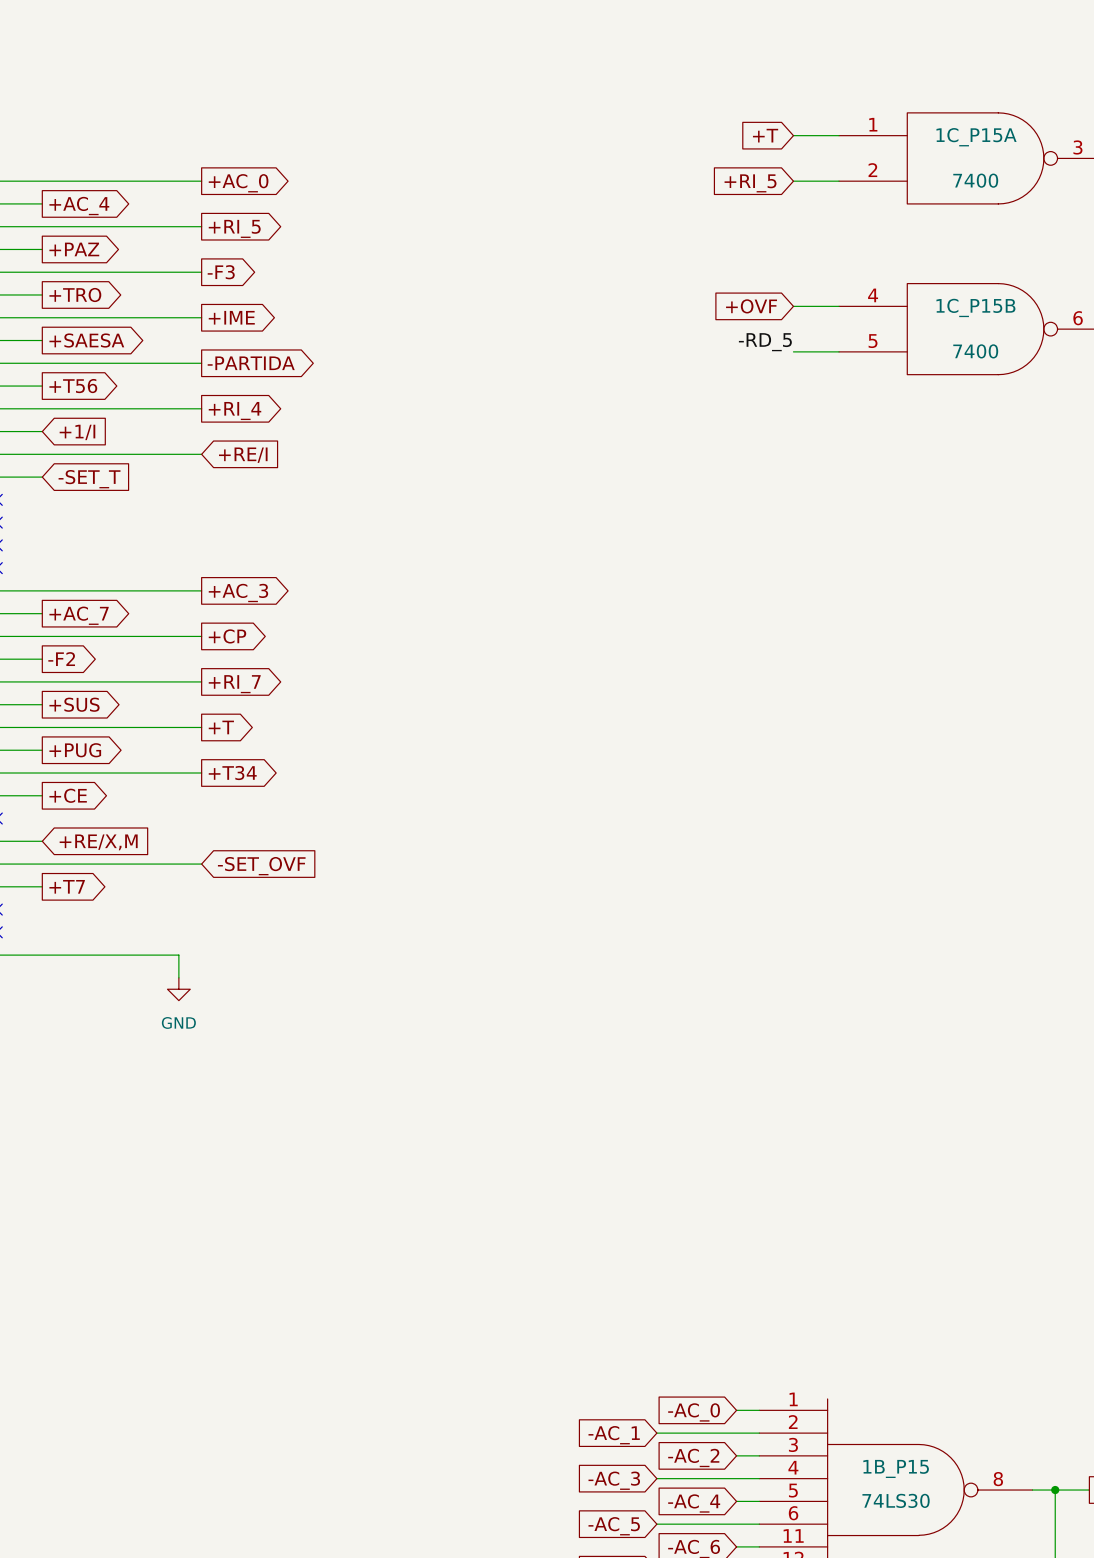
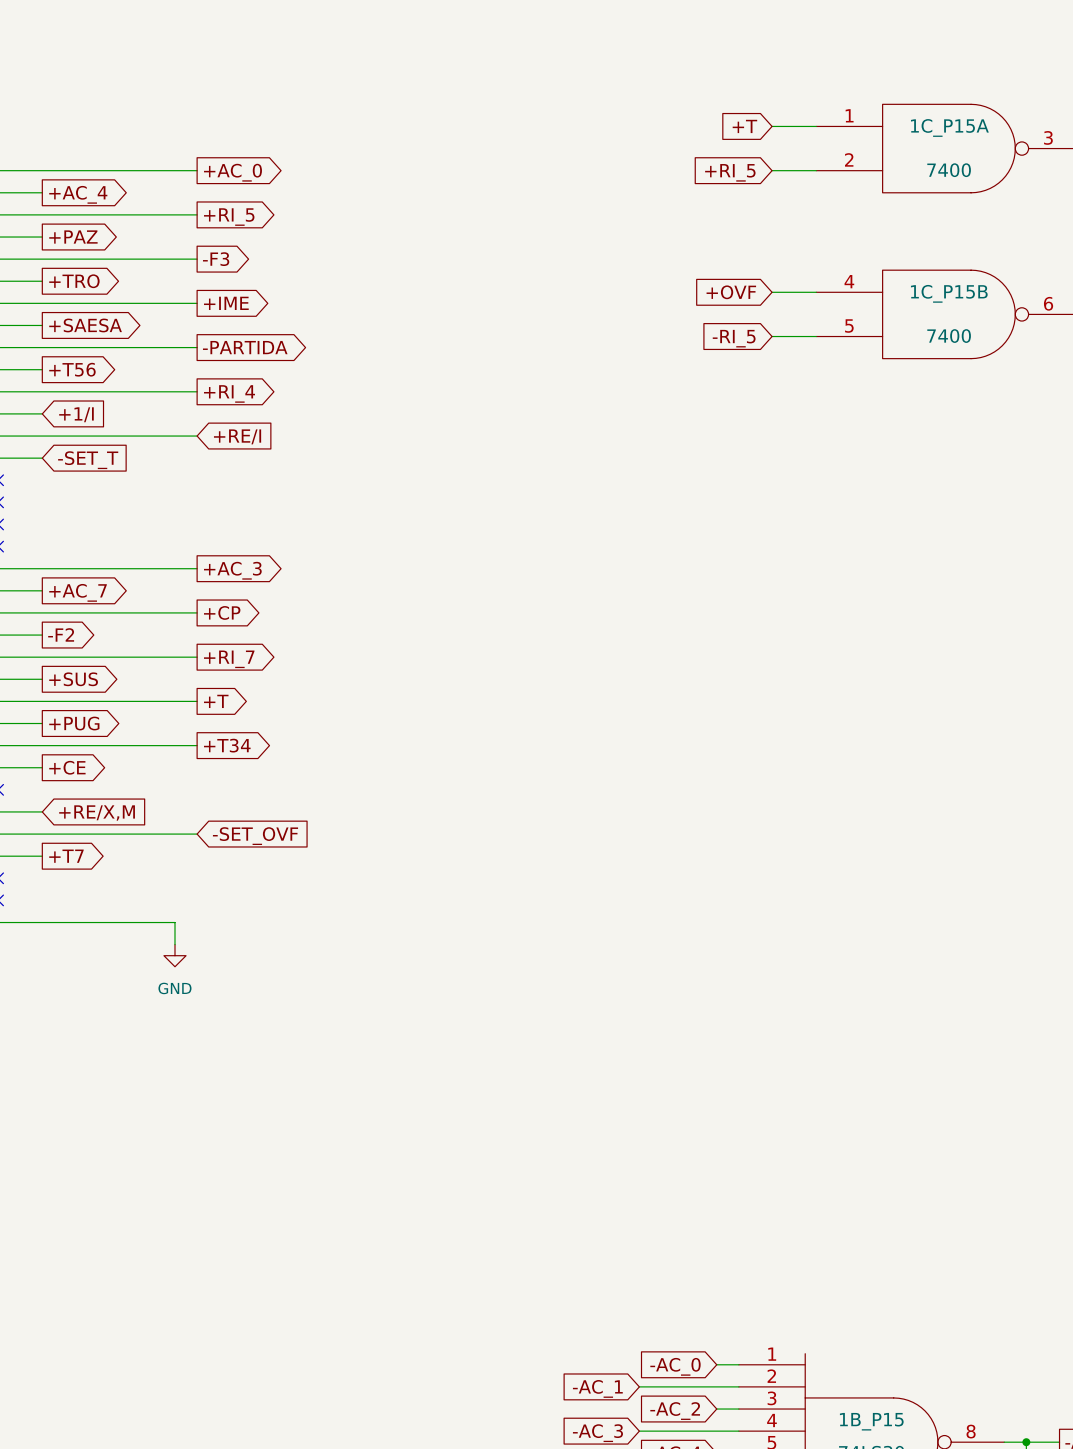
label: -RD_5 (765, 342) -> none
global label: none -> -RI_5 (734, 338)

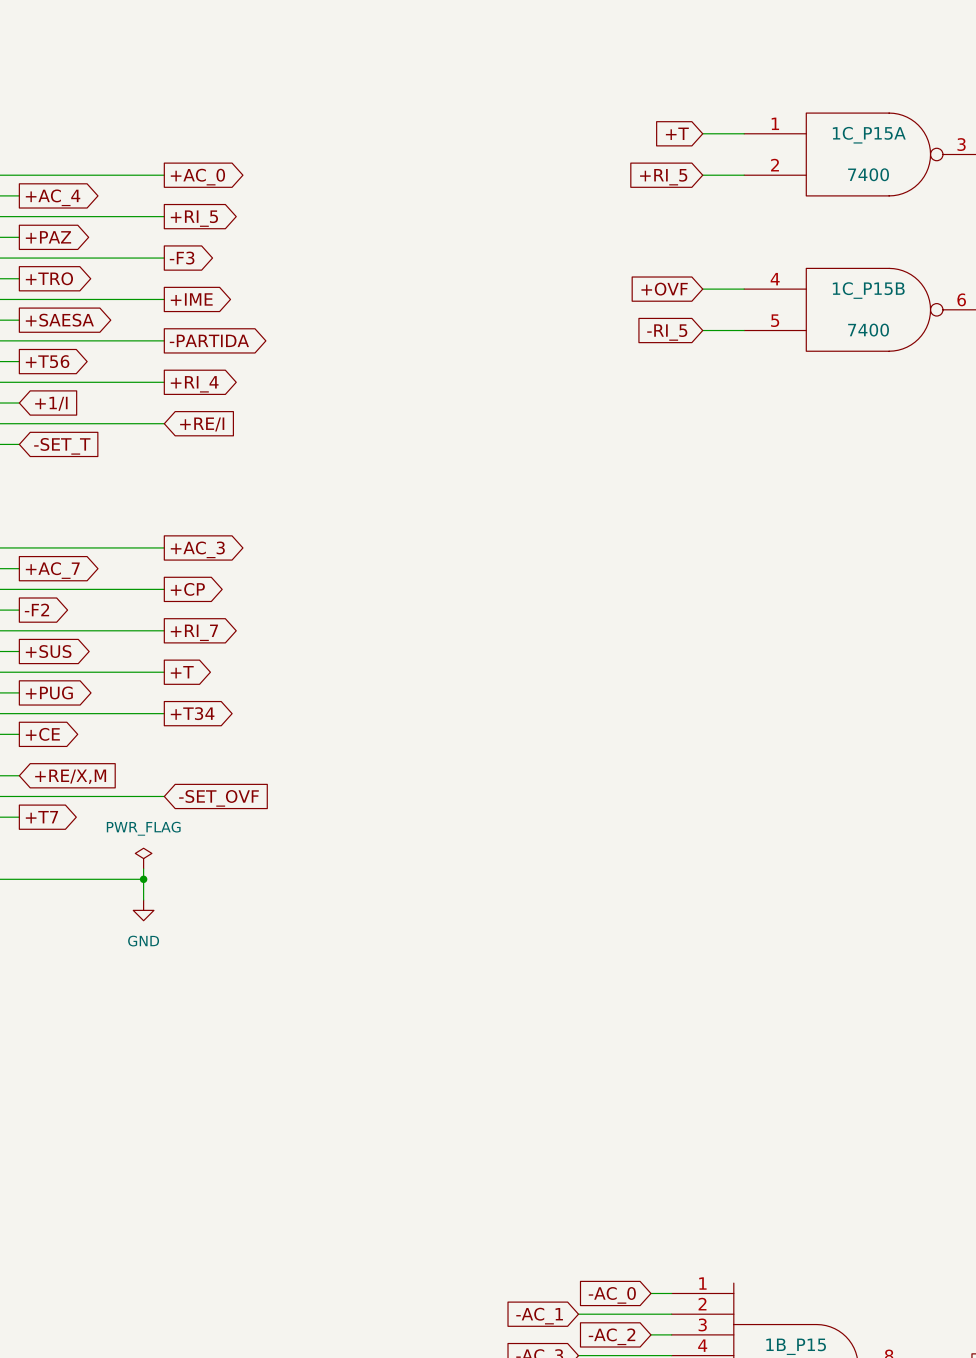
power symbol: none -> PWR_FLAG (143, 858)
wire: none -> (143, 868) (143, 879)
junction: none -> (143, 879)

